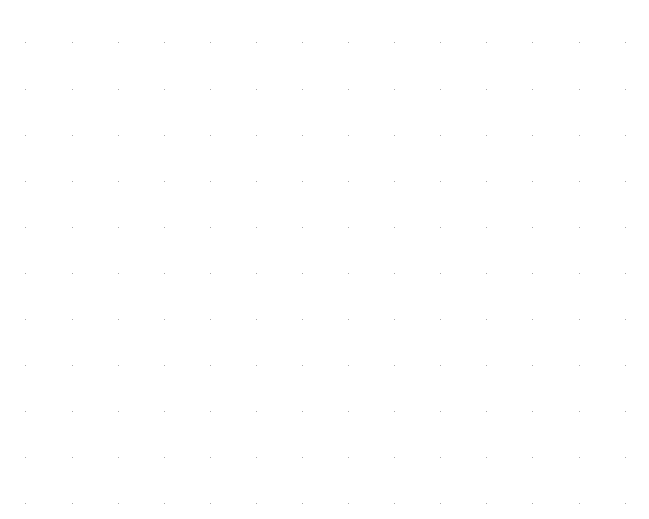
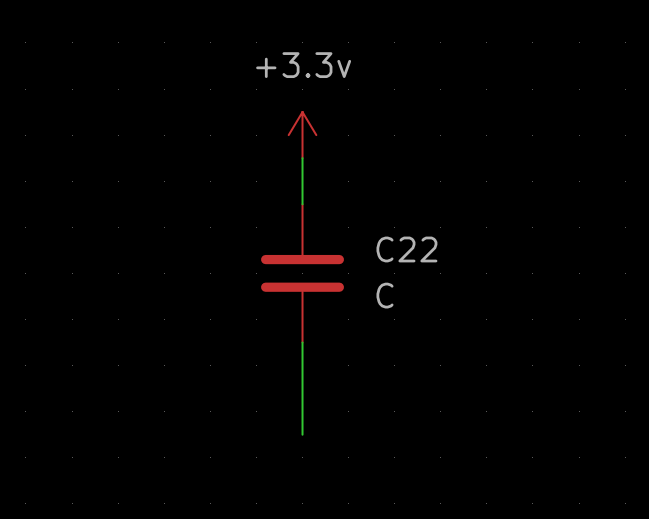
power symbol: none -> +3.3v (302, 135)
wire: none -> (302, 158) (302, 204)
C22: none -> C (302, 273)
wire: none -> (302, 342) (302, 434)

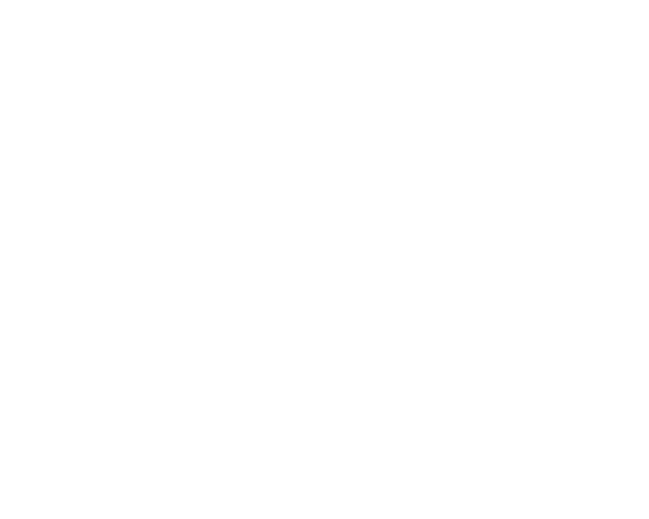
power symbol: +3.3v (302, 135) -> none
wire: (302, 158) (302, 204) -> none
C22: C (302, 273) -> none
wire: (302, 342) (302, 434) -> none

